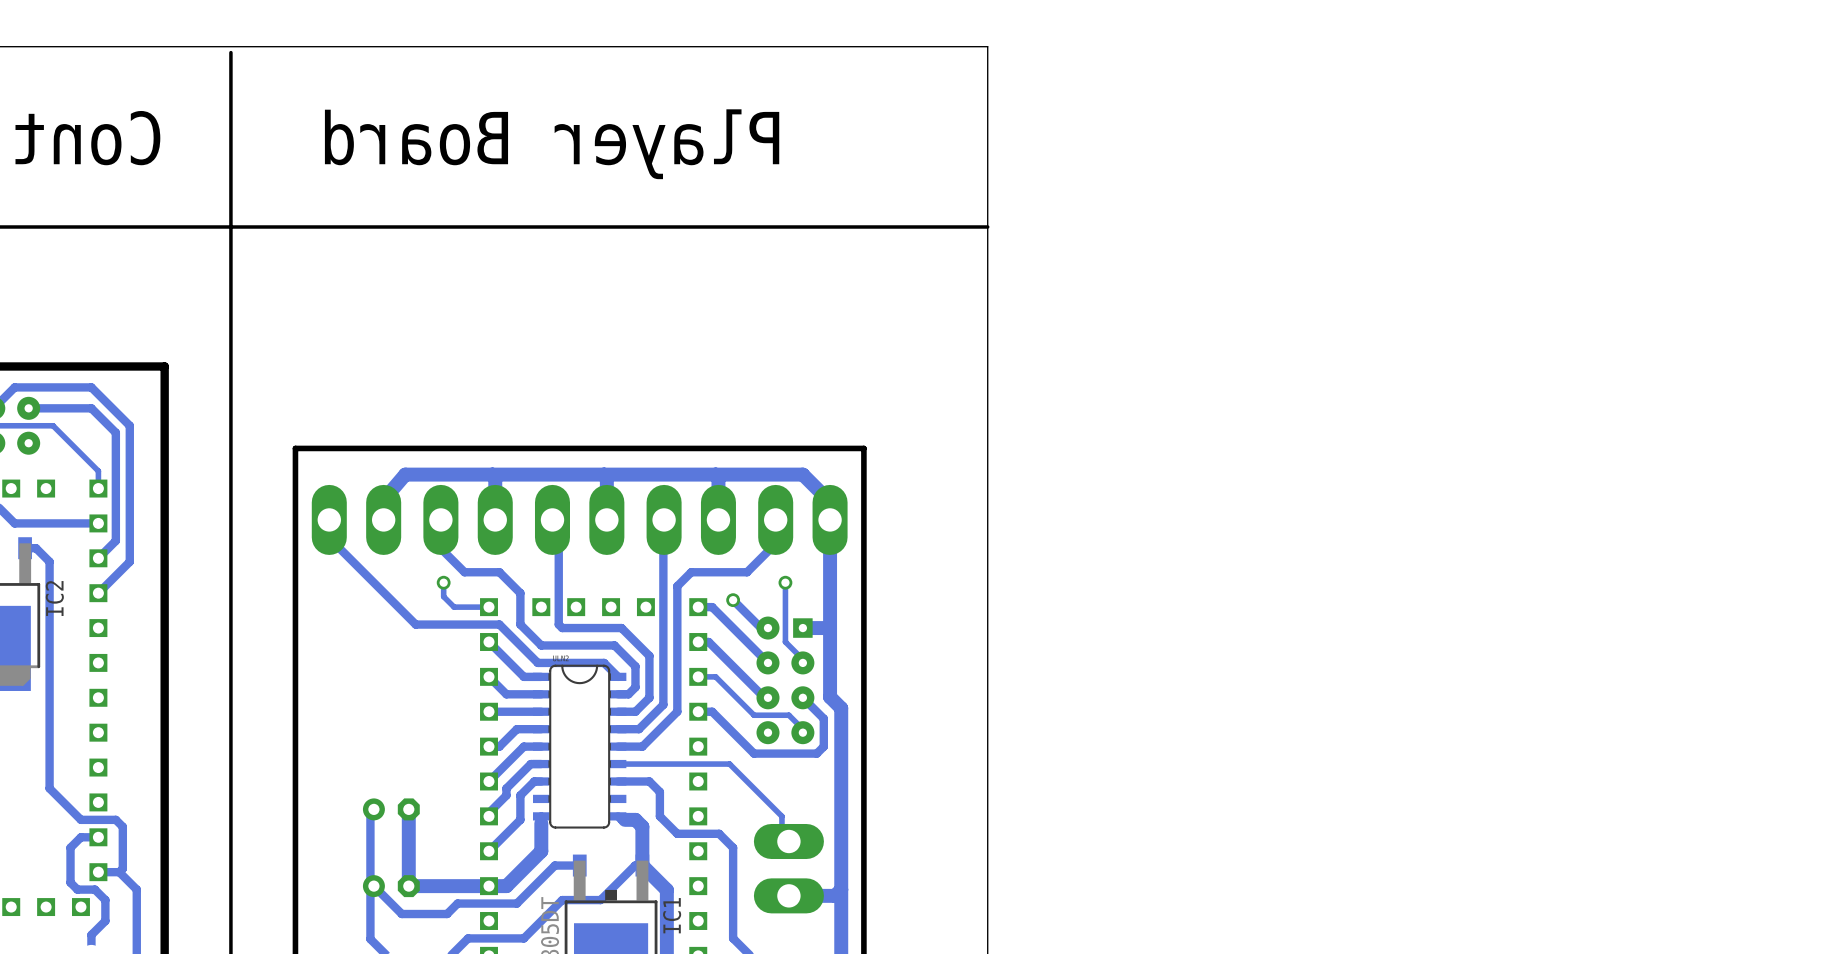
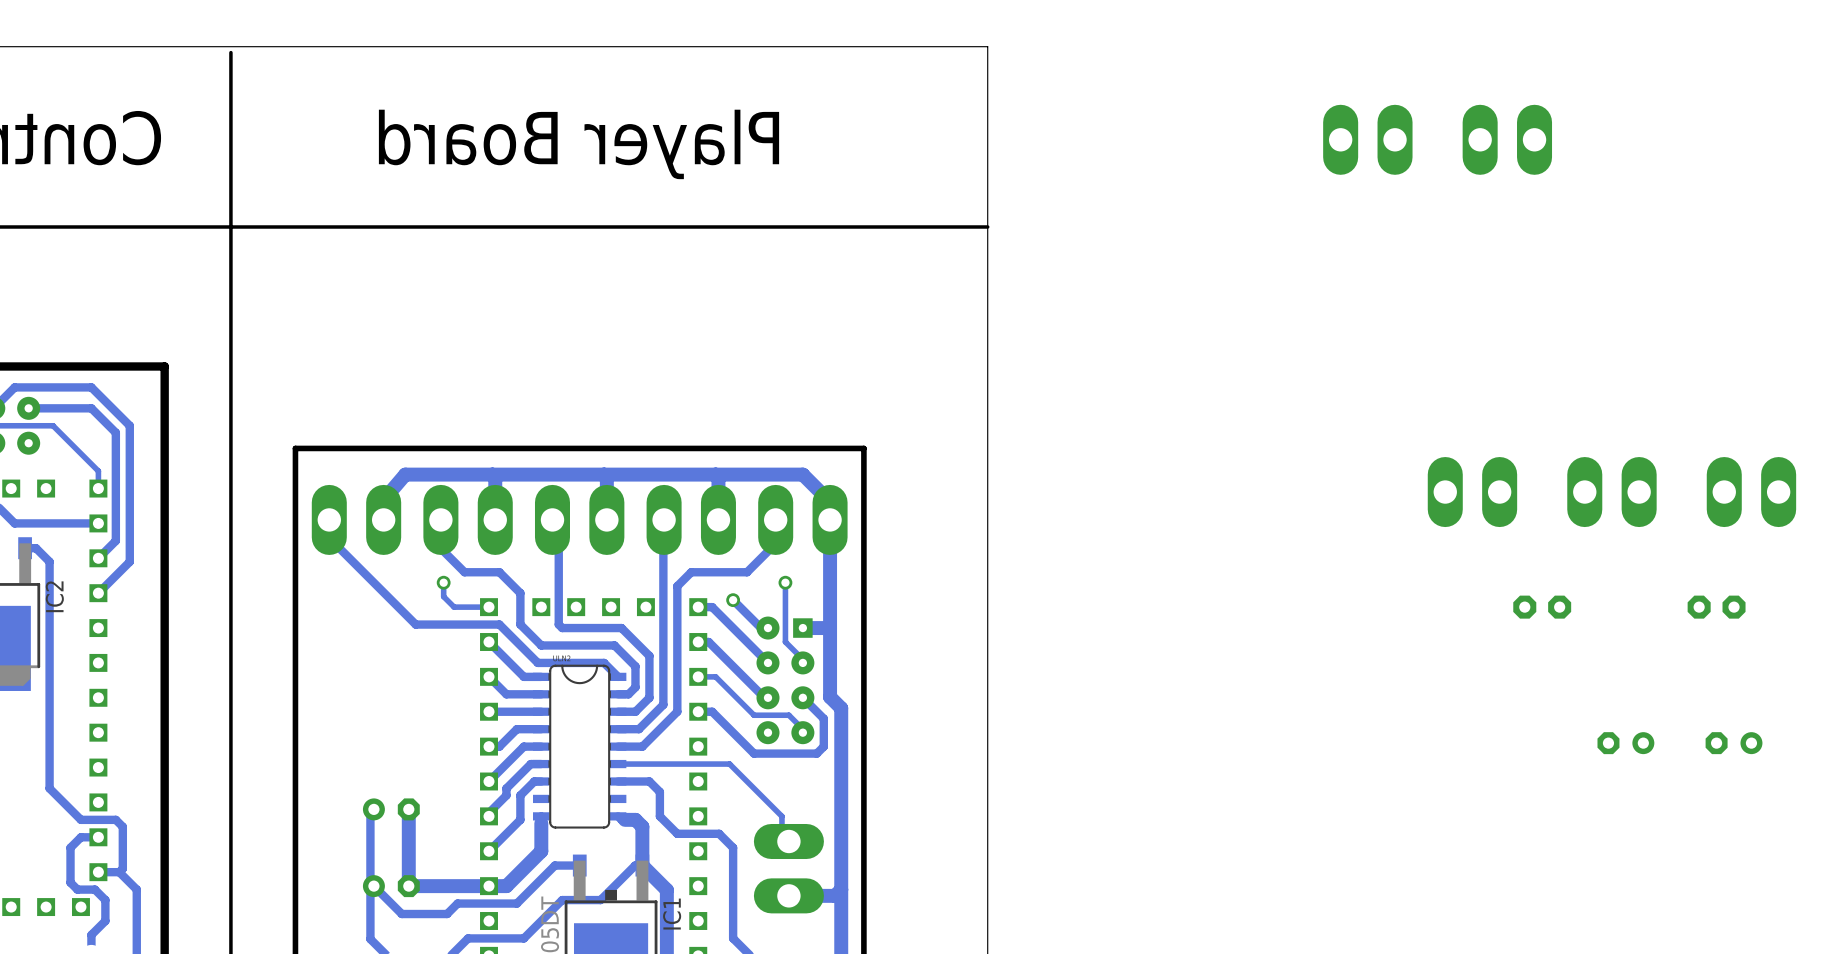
part: none -> (1367, 139)
part: none -> (1507, 139)
part: none -> (1472, 492)
part: none -> (1611, 492)
part: none -> (1751, 492)
part: none -> (1542, 607)
part: none -> (1716, 607)
part: none -> (1625, 743)
part: none -> (1734, 743)

